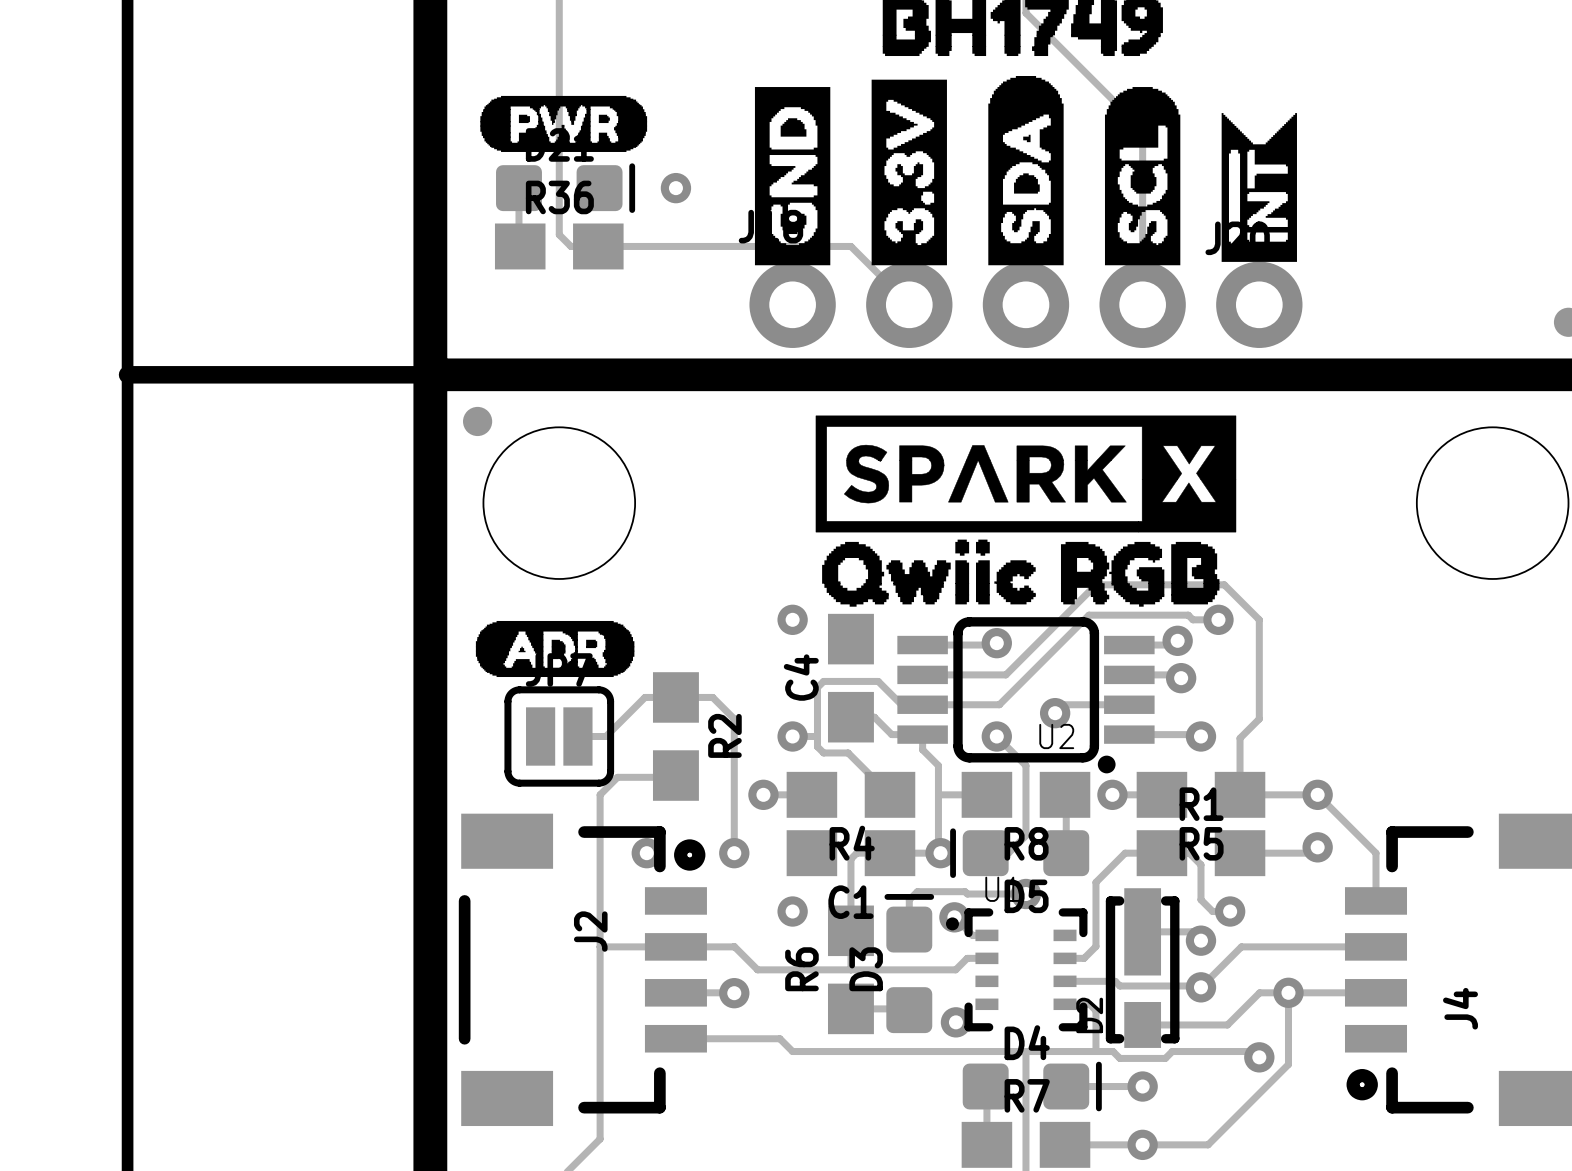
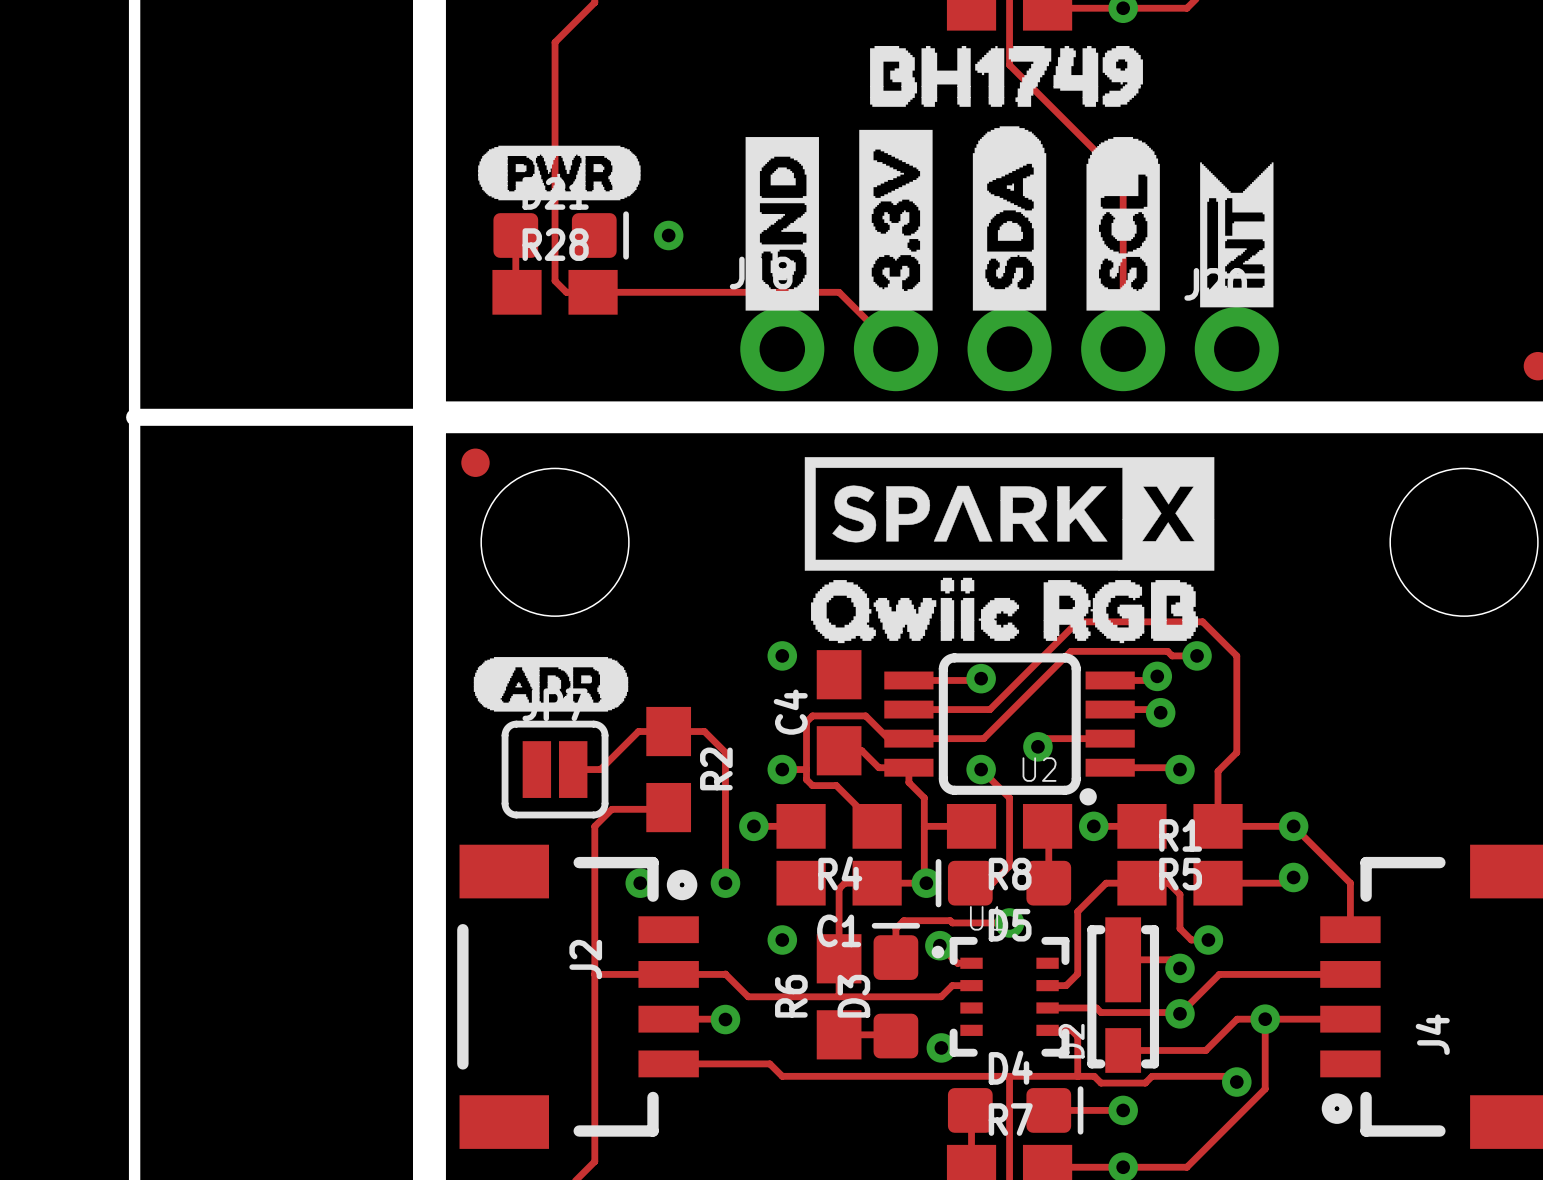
R36 name: R36 (559, 197) -> R28 (555, 244)

